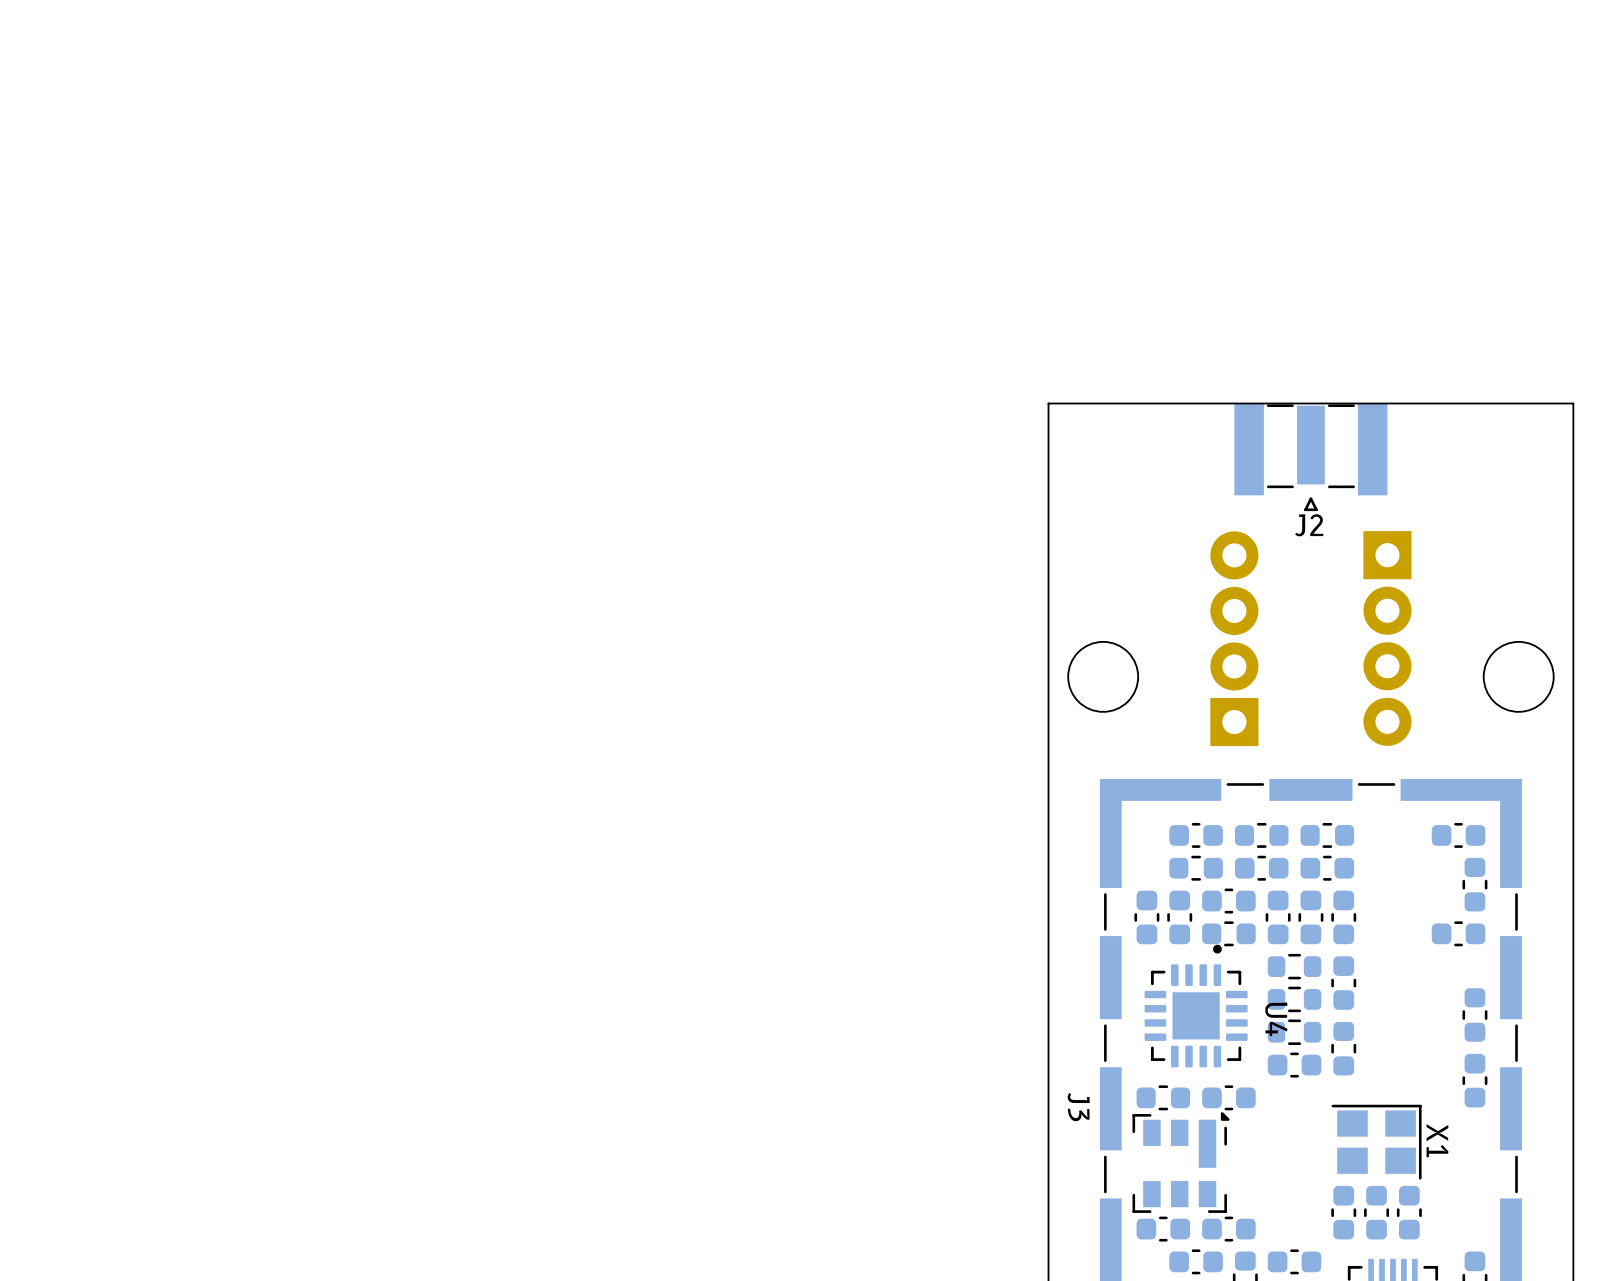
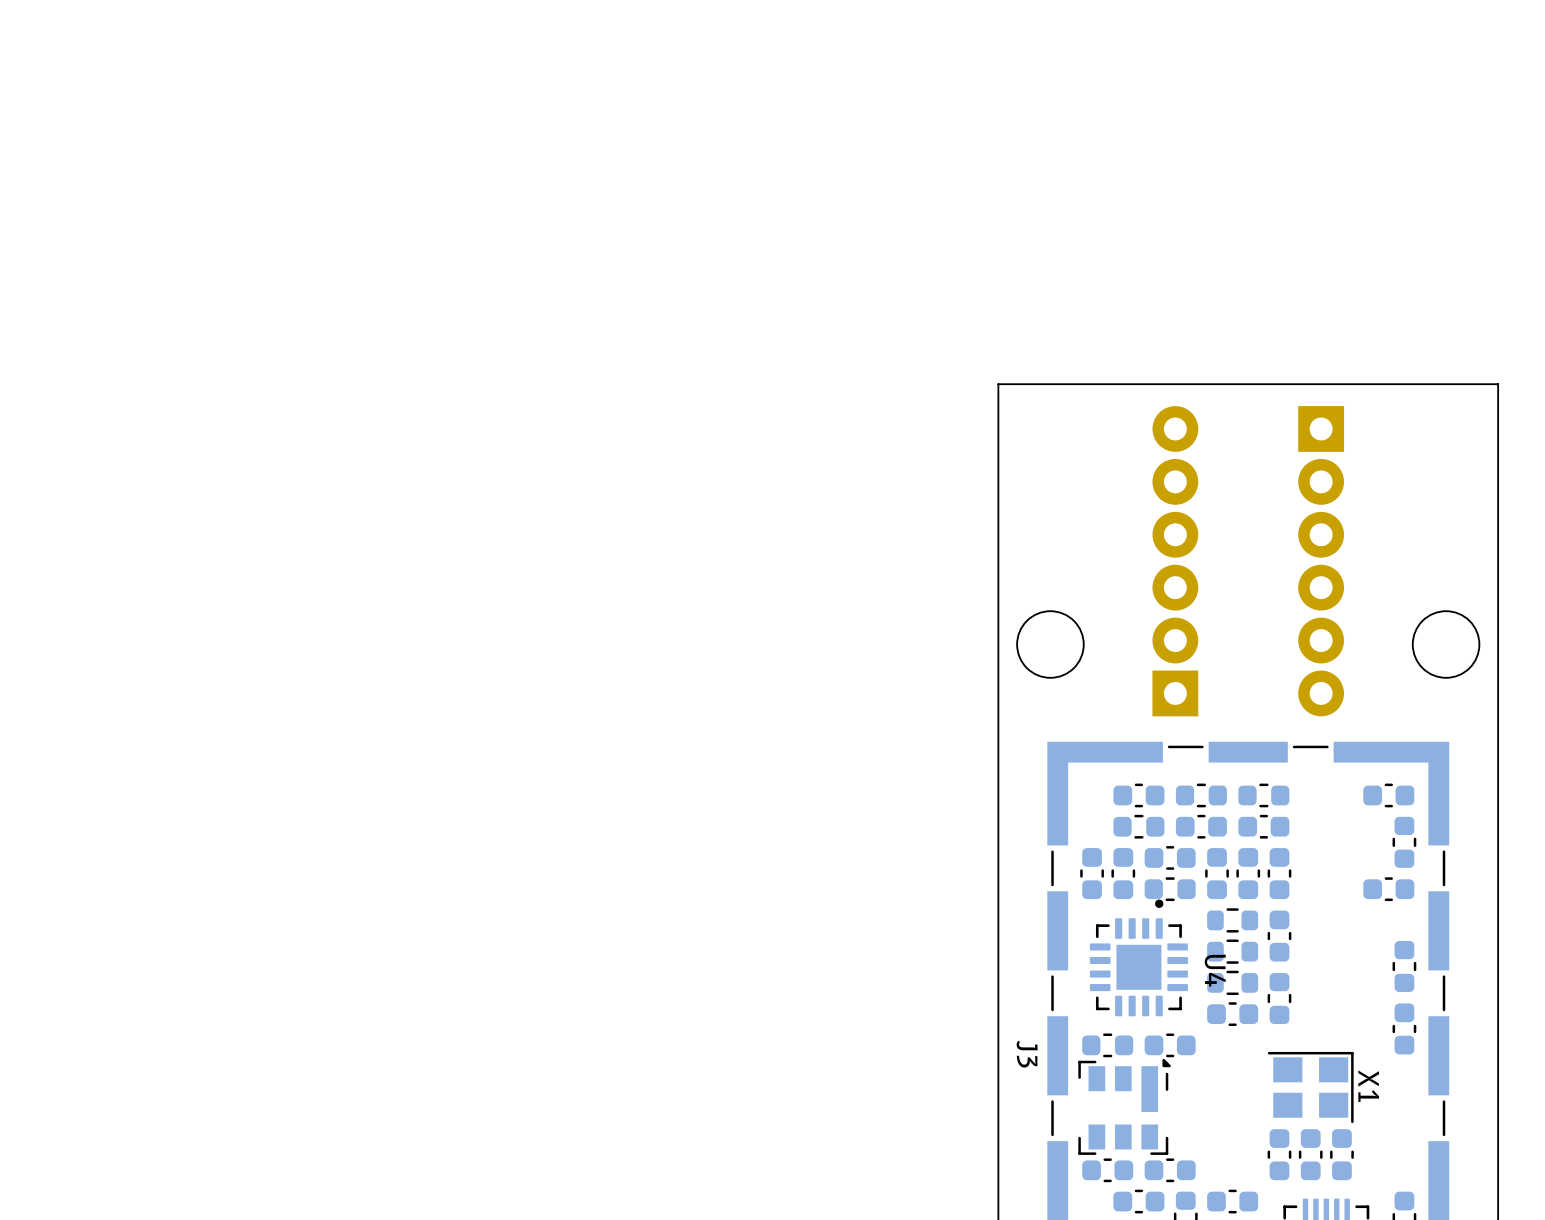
J2: (1310, 457) -> none
part: none -> (1175, 561)
part: none -> (1321, 561)
part: (1234, 638) -> none
part: (1387, 638) -> none

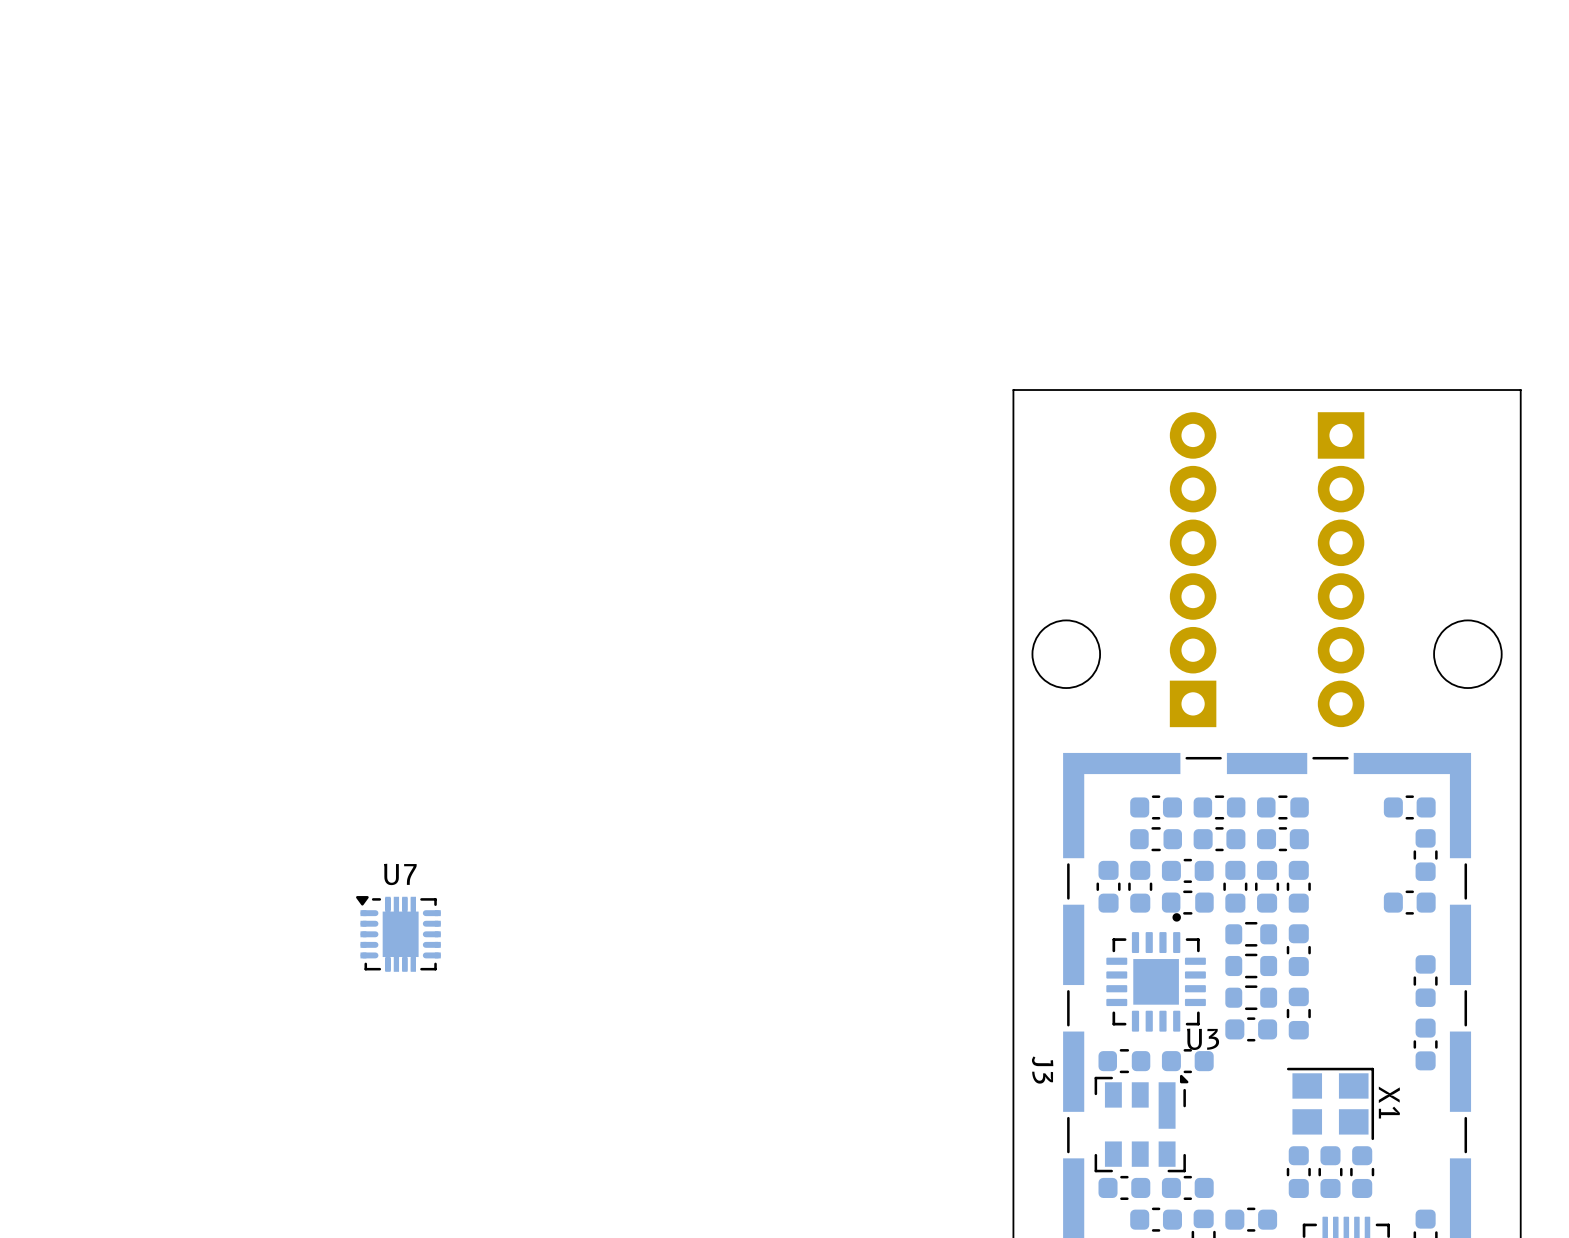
U7: none -> (398, 933)
U4 name: U4 (1215, 970) -> U3 (1203, 1039)

